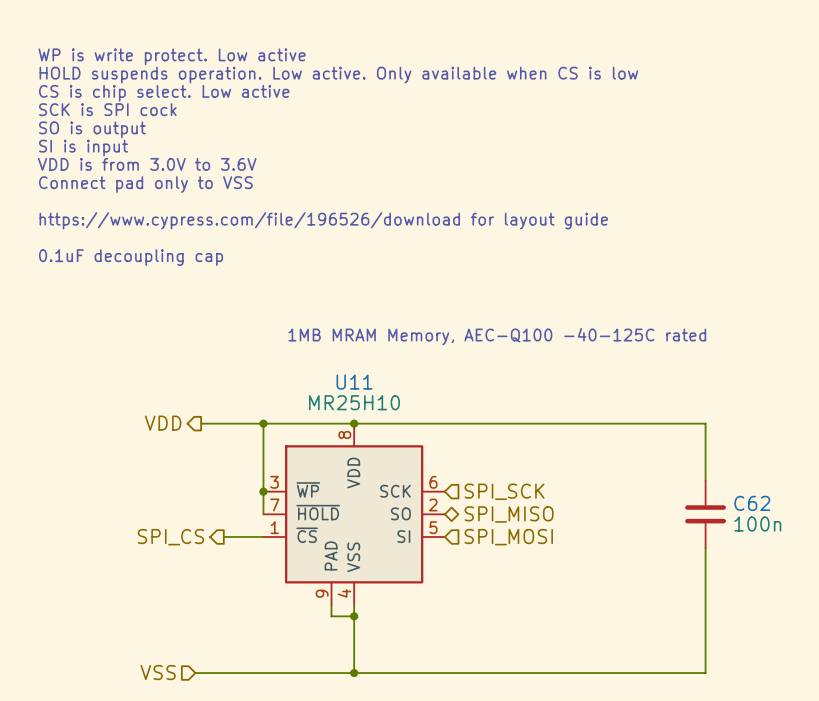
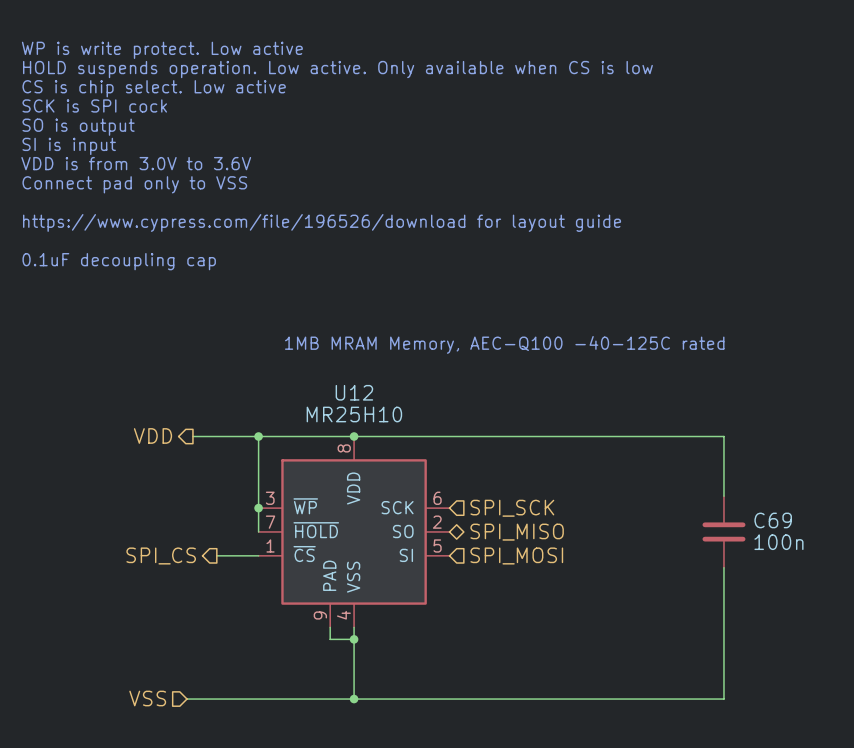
U11 name: U11 (354, 382) -> U12 (354, 392)
C62 name: C62 (752, 503) -> C69 (773, 520)

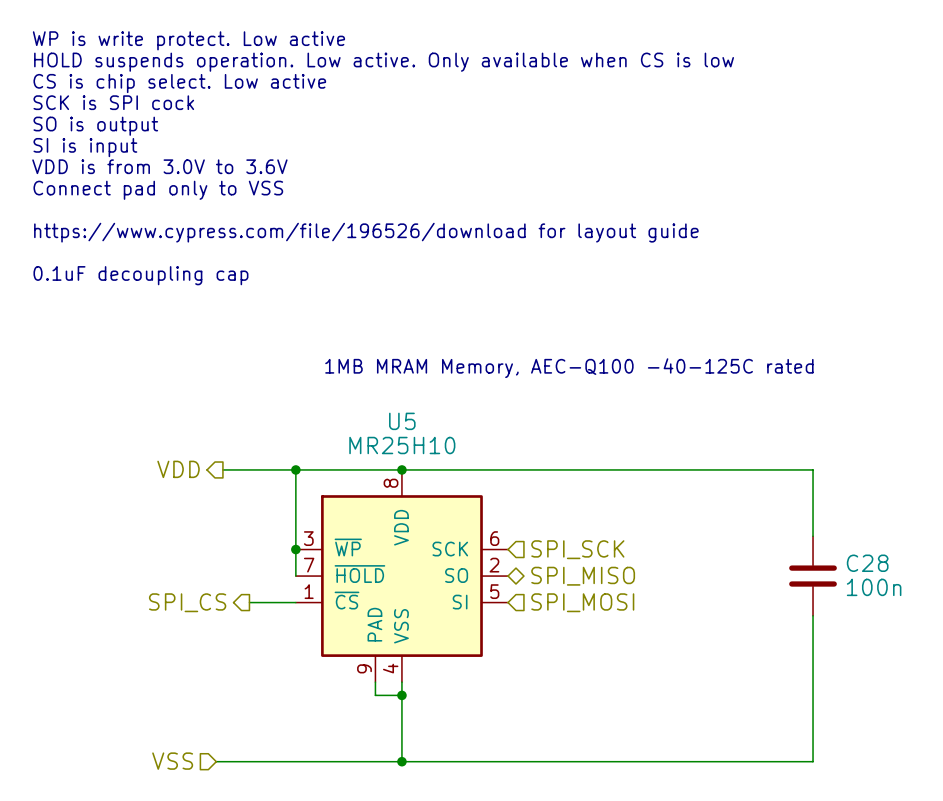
U12 name: U12 (354, 392) -> U5 (402, 421)
C69 name: C69 (773, 520) -> C28 (867, 563)

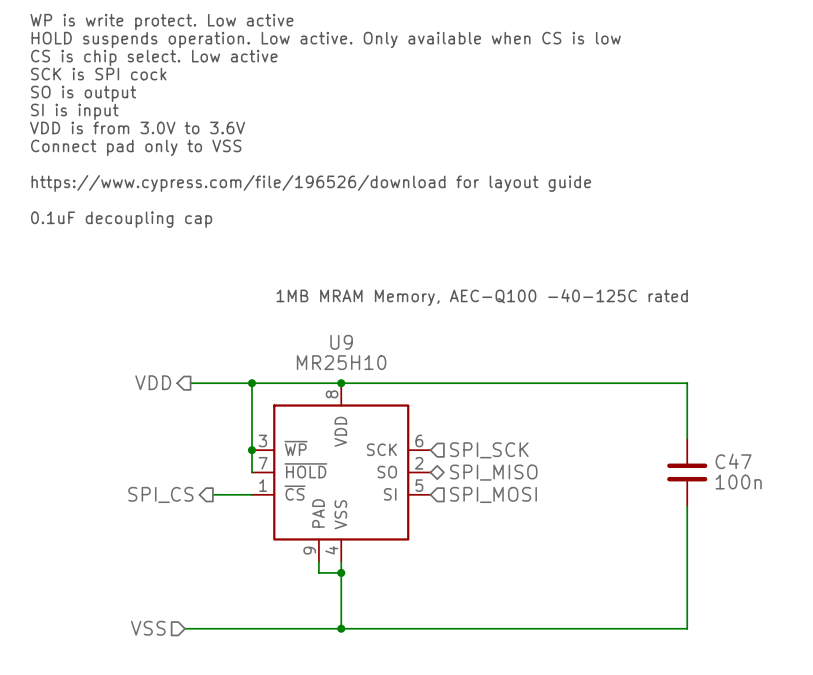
U5 name: U5 (402, 421) -> U9 (341, 342)
C28 name: C28 (867, 563) -> C47 (733, 461)

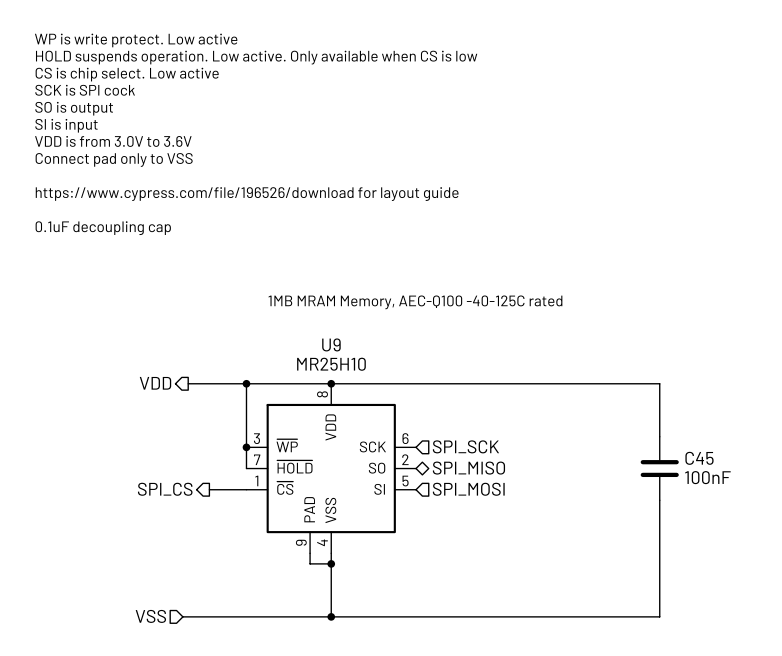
C47 name: C47 (733, 461) -> C45 (699, 458)
C47 value: 100n (738, 482) -> 100nF (707, 477)

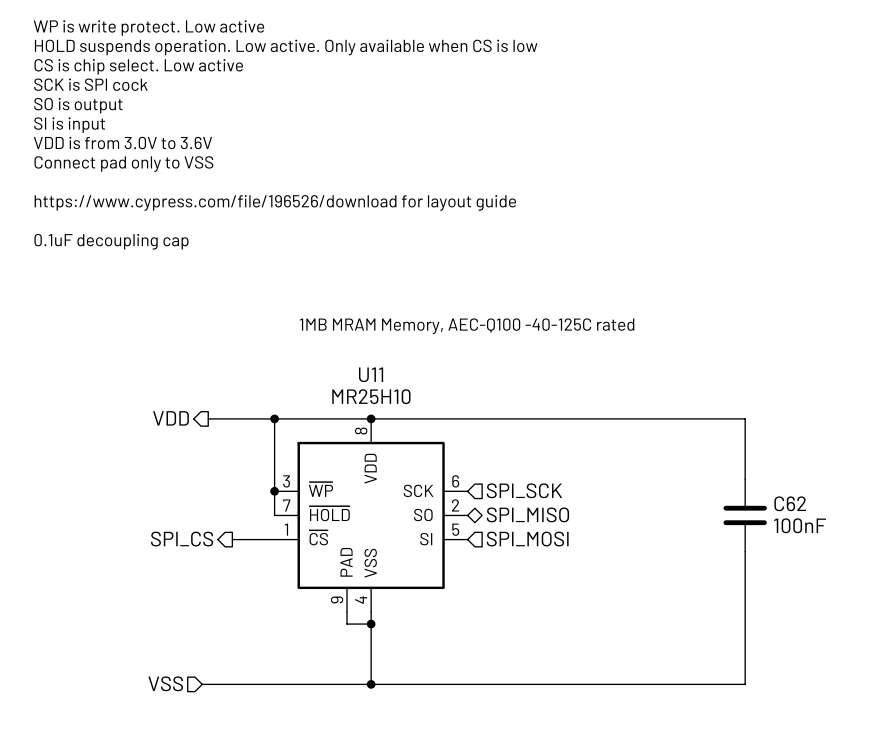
U9 name: U9 (331, 344) -> U11 (371, 374)
C45 name: C45 (699, 458) -> C62 (790, 503)

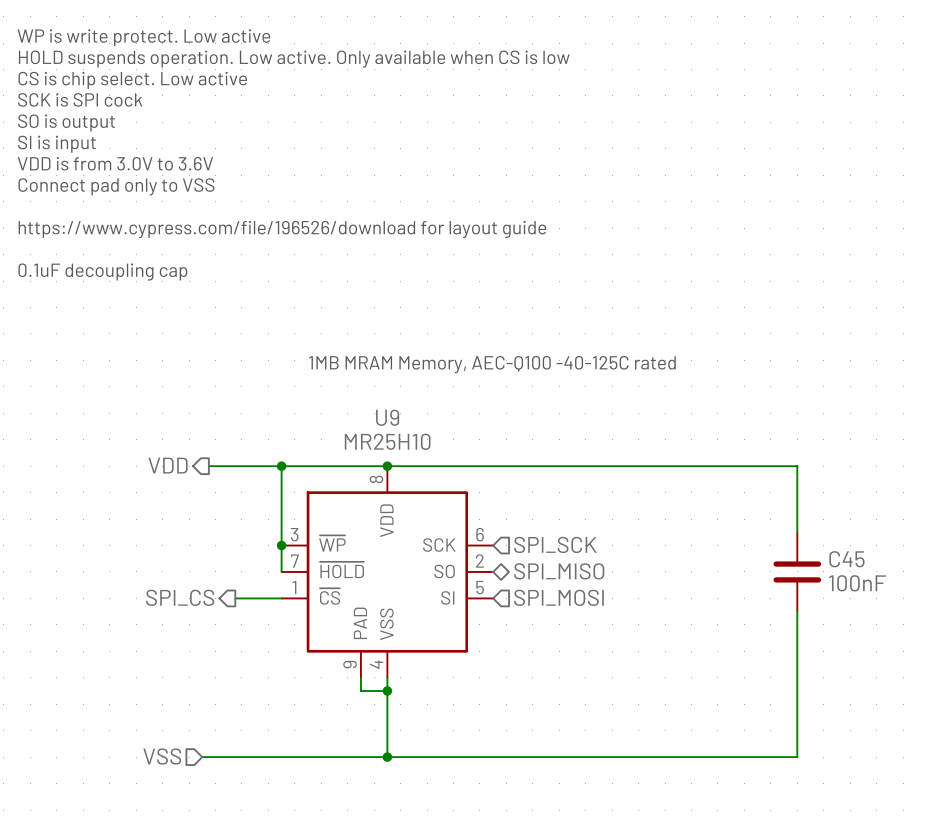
U11 name: U11 (371, 374) -> U9 (387, 417)
C62 name: C62 (790, 503) -> C45 (846, 559)

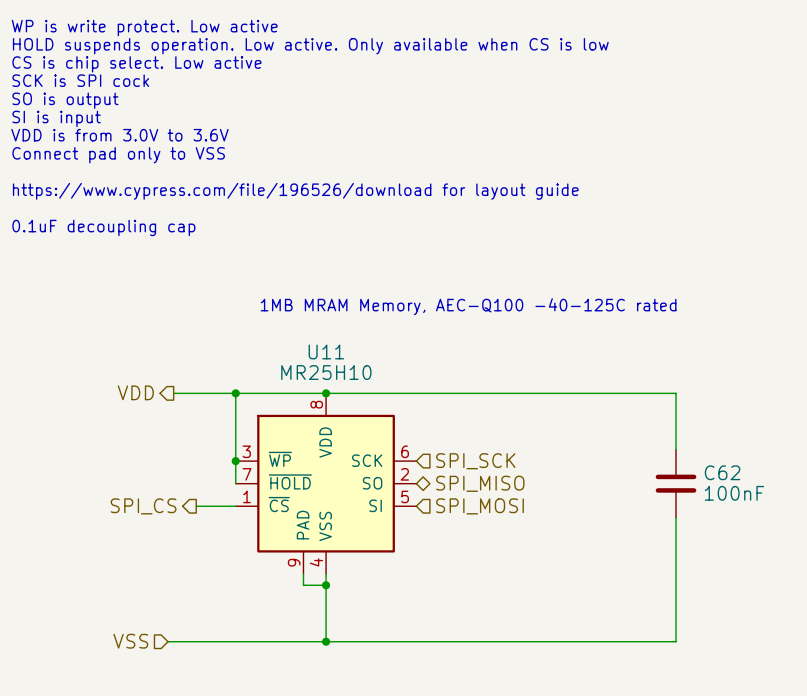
U9 name: U9 (387, 417) -> U11 (326, 351)
C45 name: C45 (846, 559) -> C62 (722, 472)

